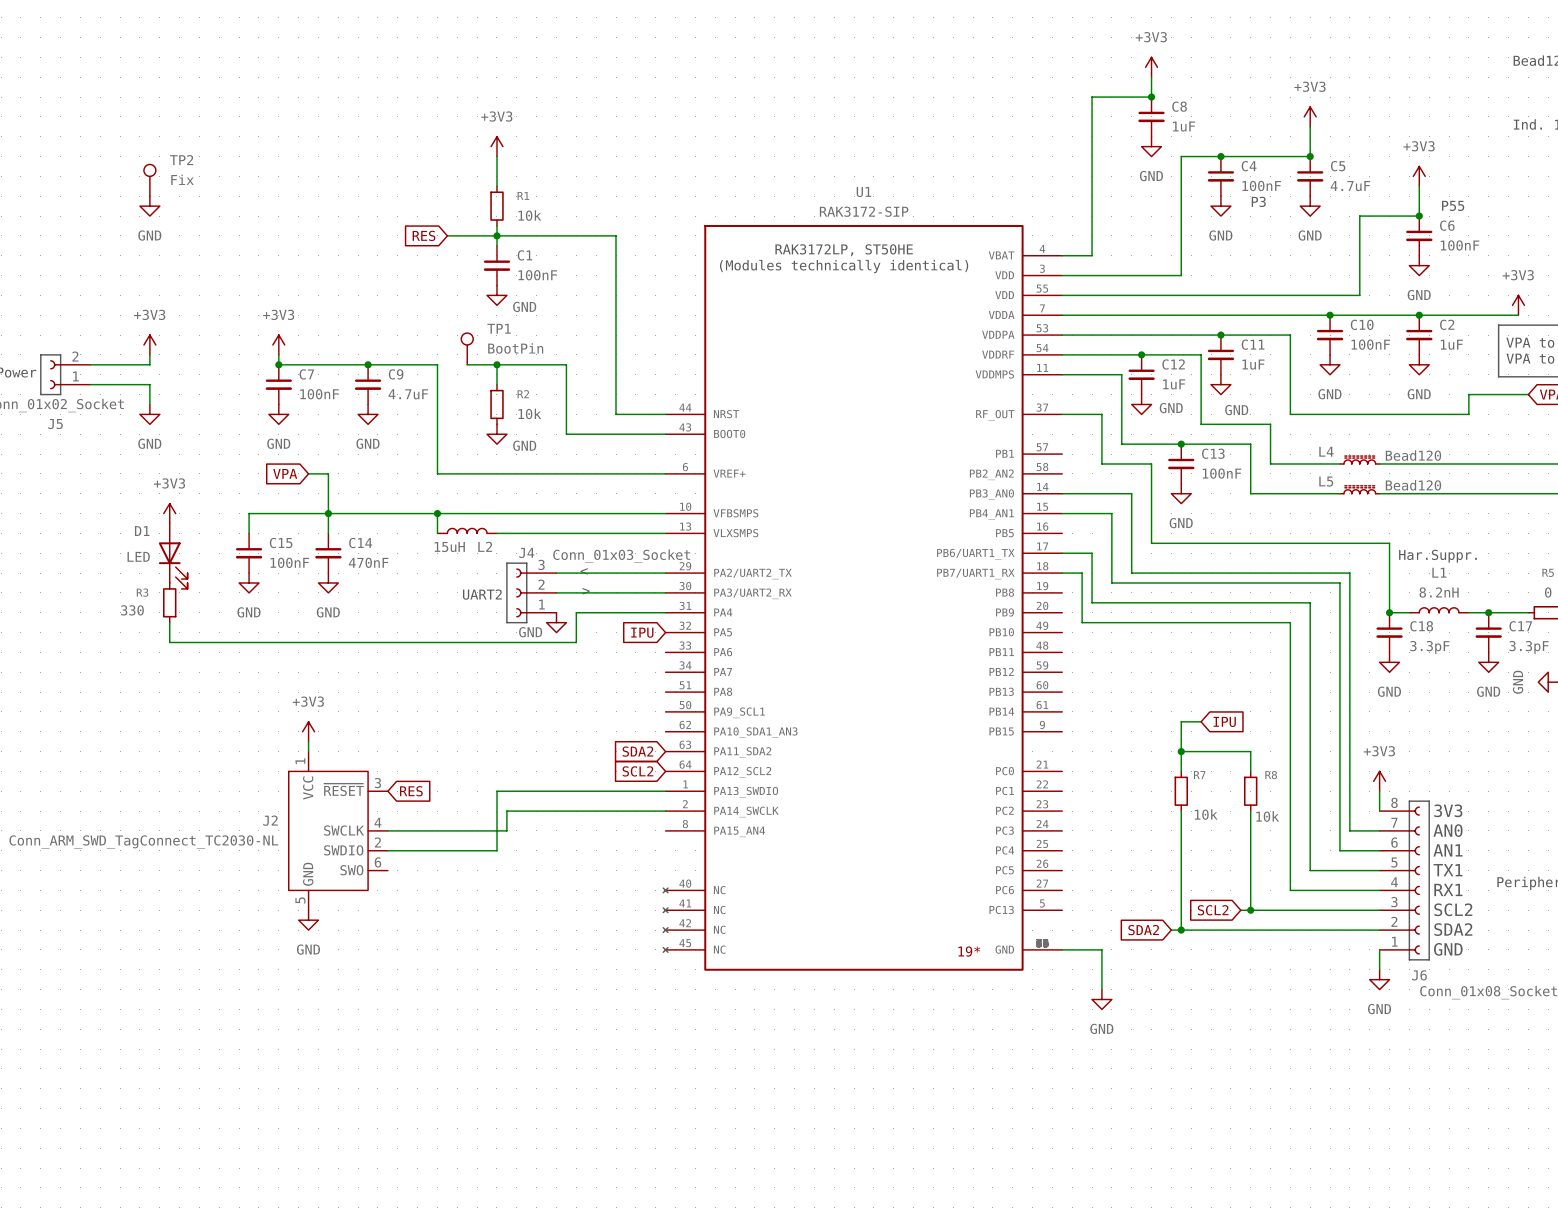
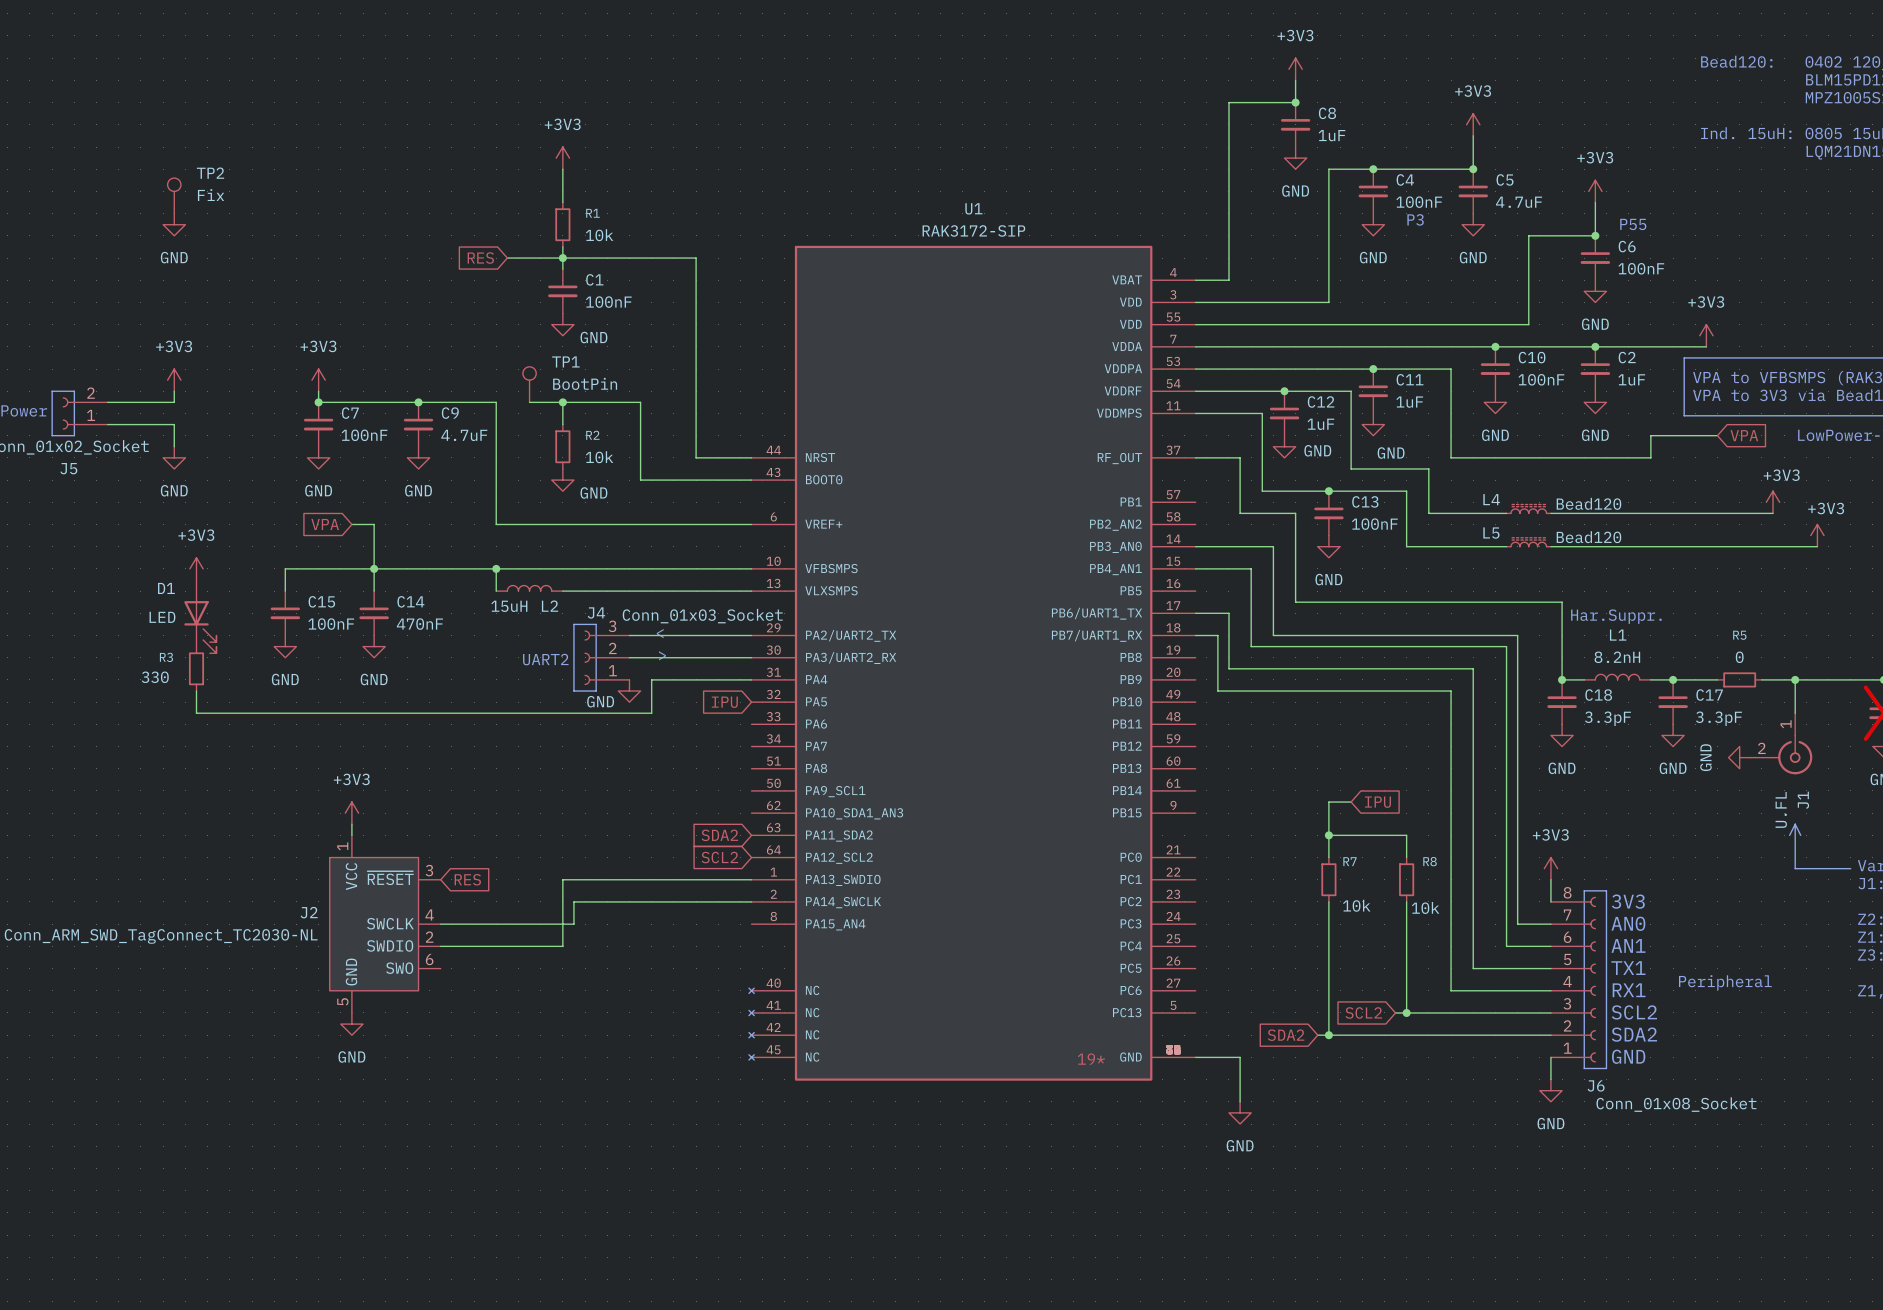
text: RAK3172LP, ST50HE (844, 250) -> none
text: (Modules technically identical) (844, 266) -> none

